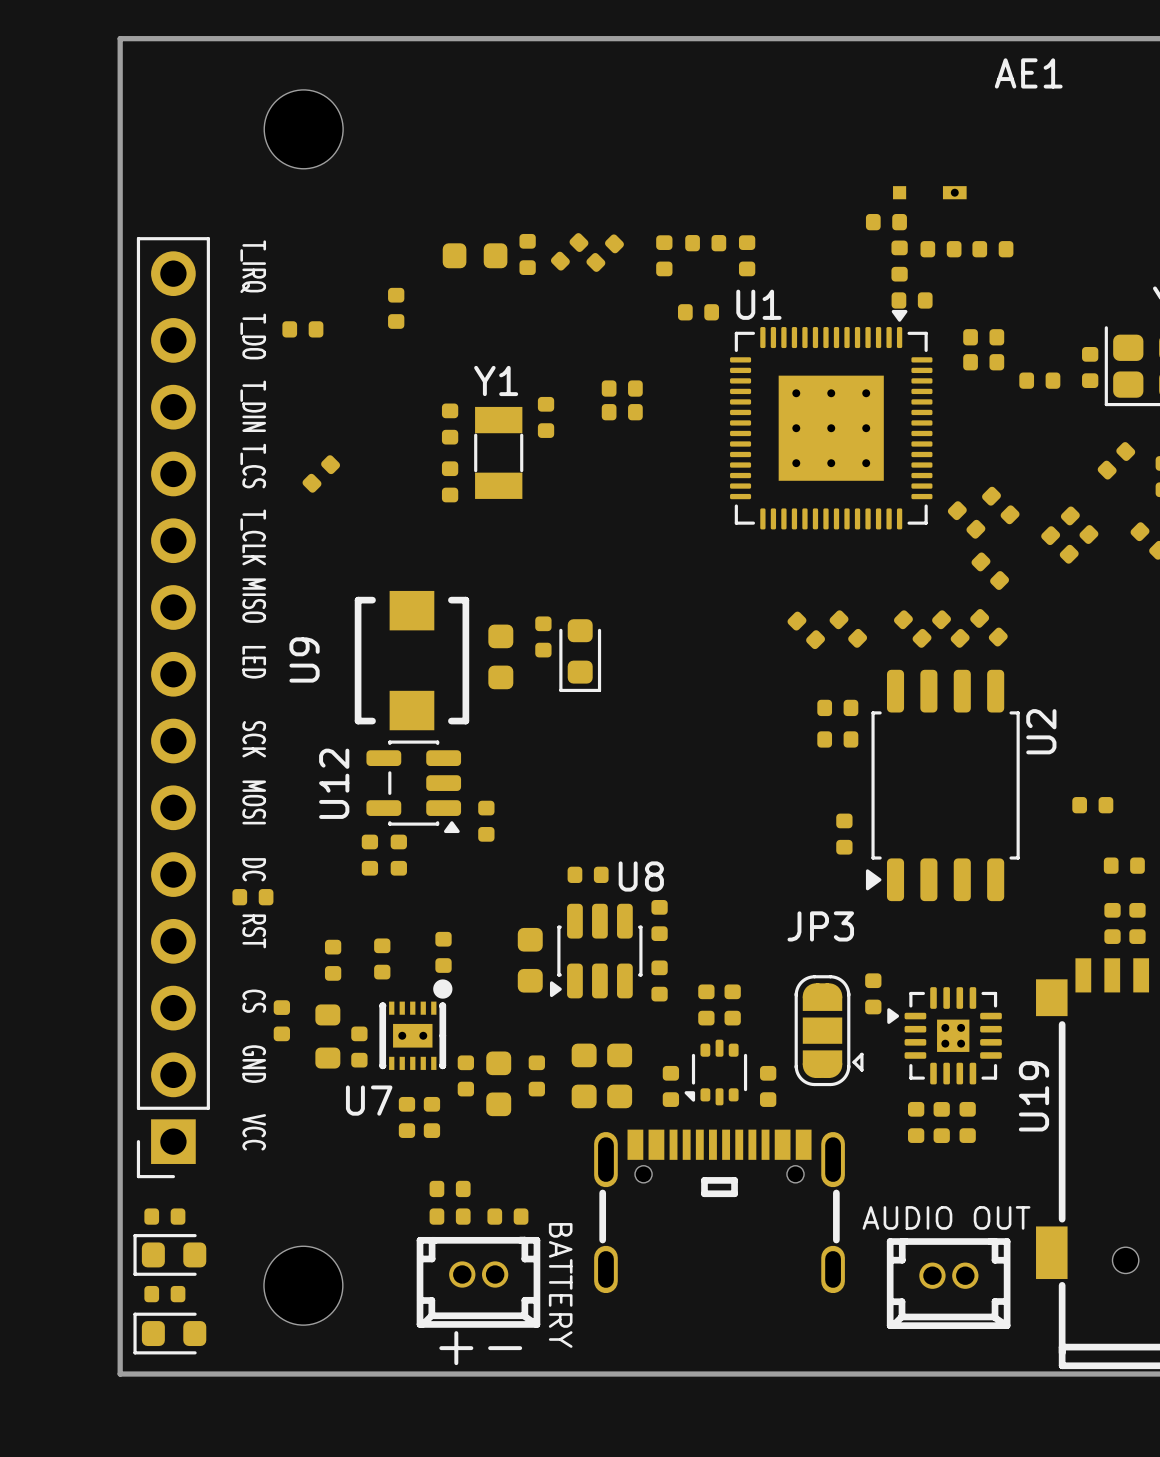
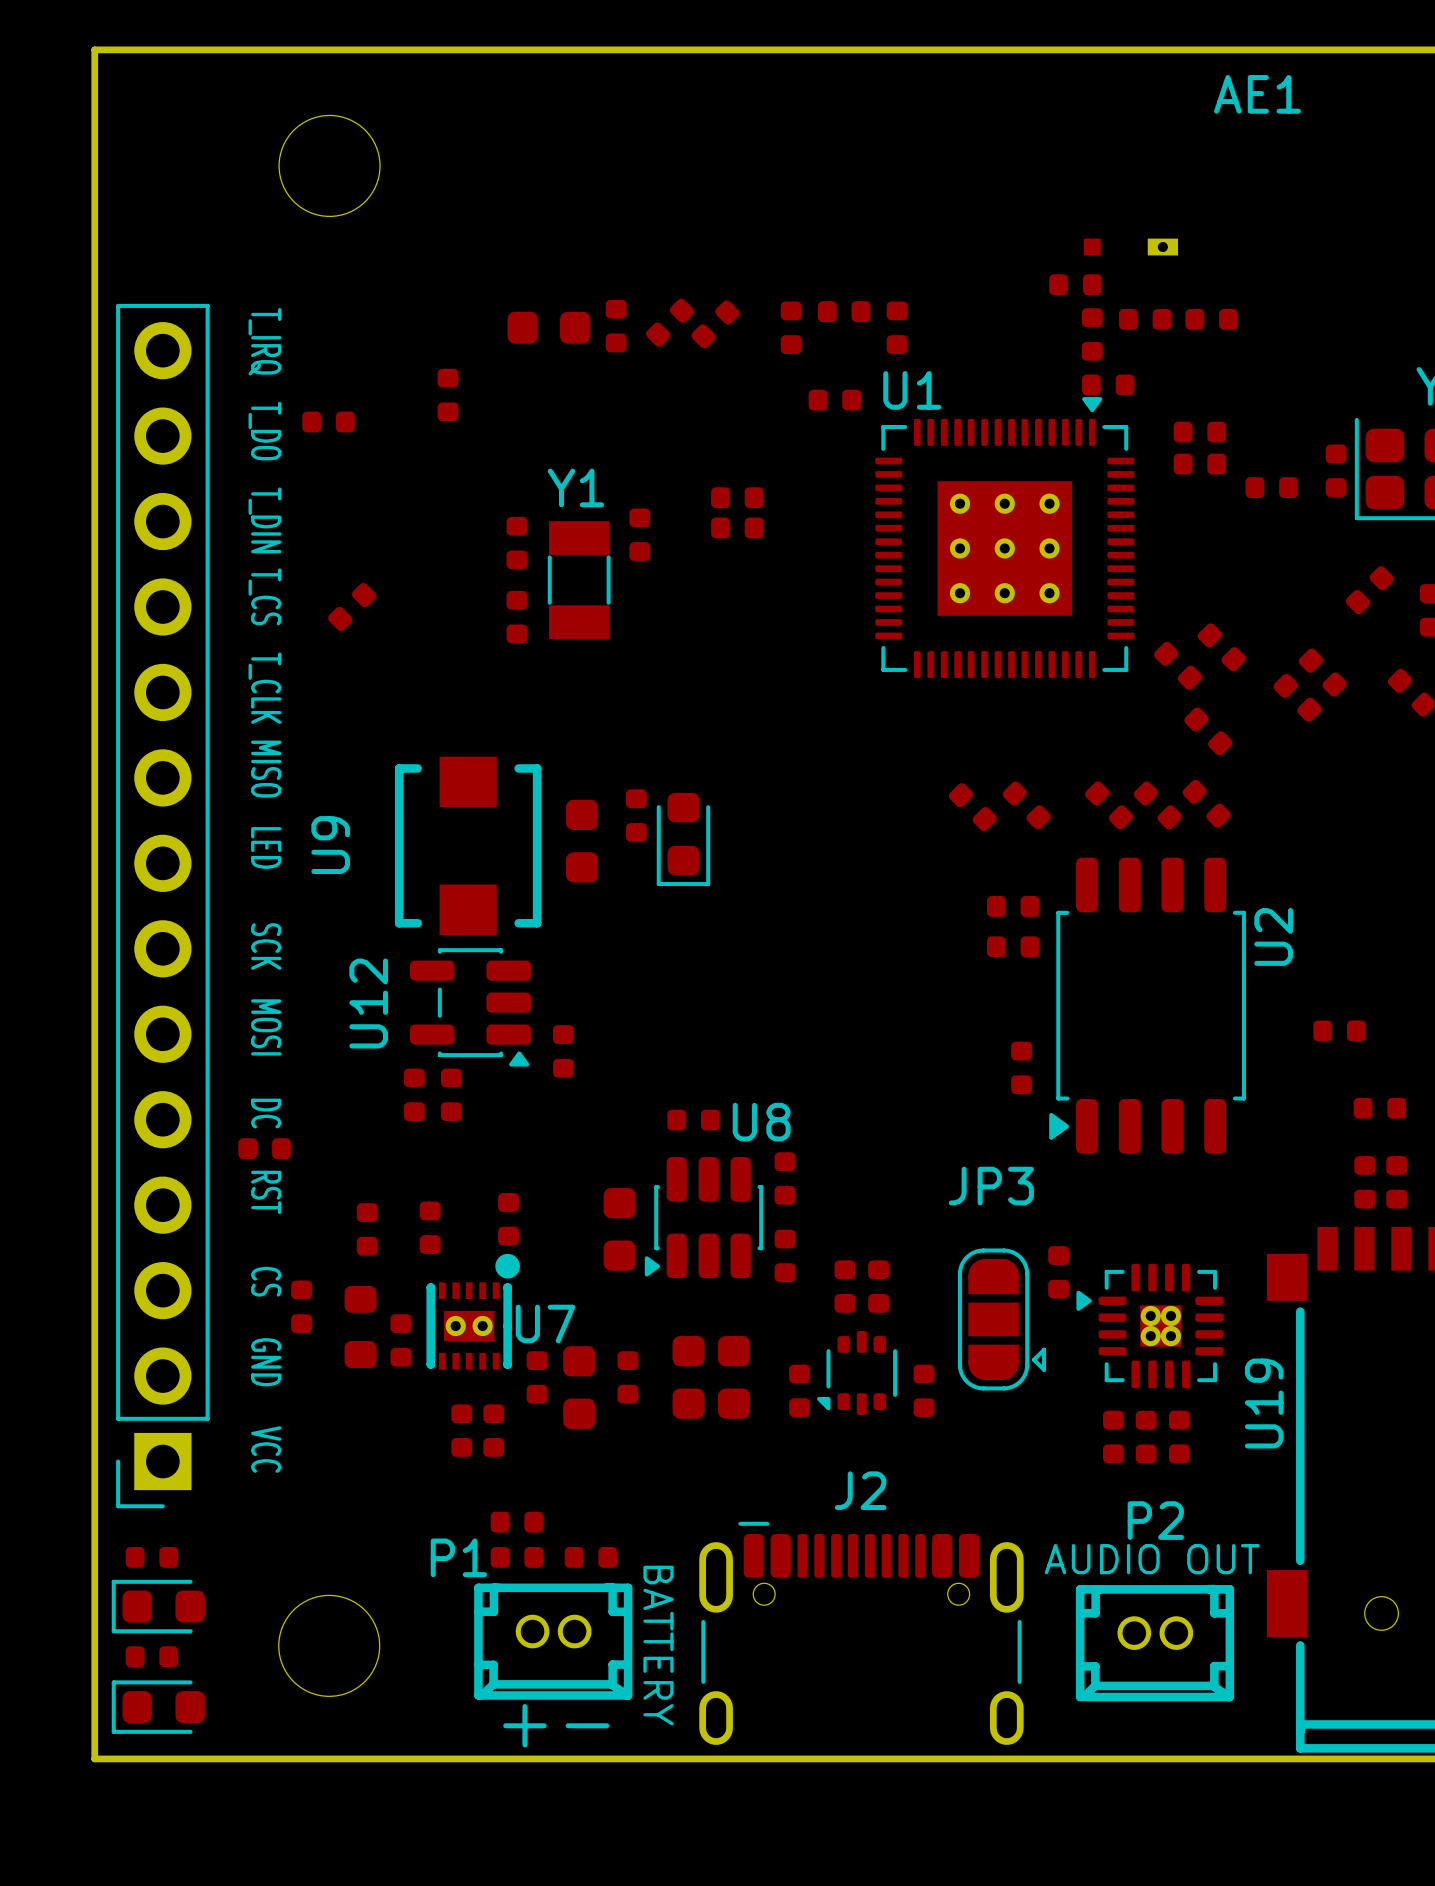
U7 name position: U7 (369, 1100) -> U7 (545, 1324)
P2 name: none -> P2 (1155, 1520)
part: (719, 1211) -> none
P1 name: none -> P1 (458, 1557)
J2: none -> (861, 1633)

